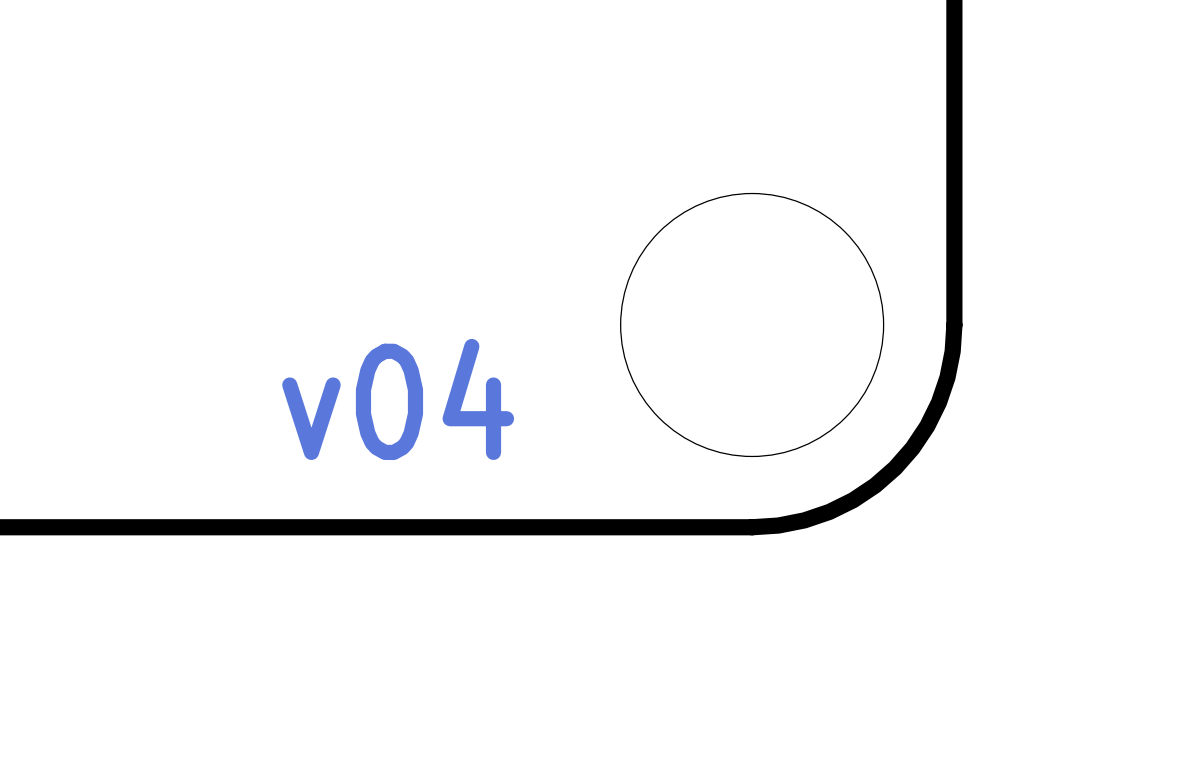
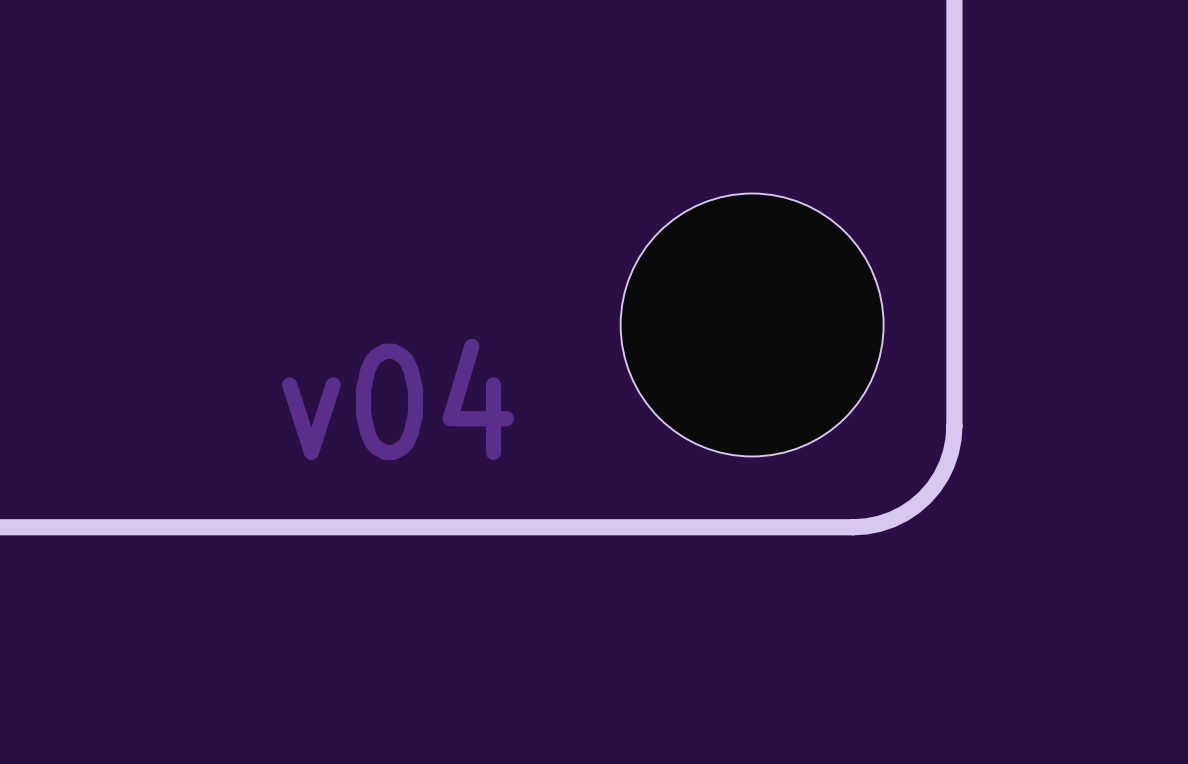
board edge: (954, 324) (952, 351) (947, 377) (939, 402) (927, 426) (912, 448) (895, 468) (875, 485) (853, 500) (829, 511) (804, 520) (778, 525) (752, 527) -> (954, 324) (953, 439) (950, 452) (940, 476) (924, 497) (903, 513) (879, 523) (866, 526) (752, 527)

